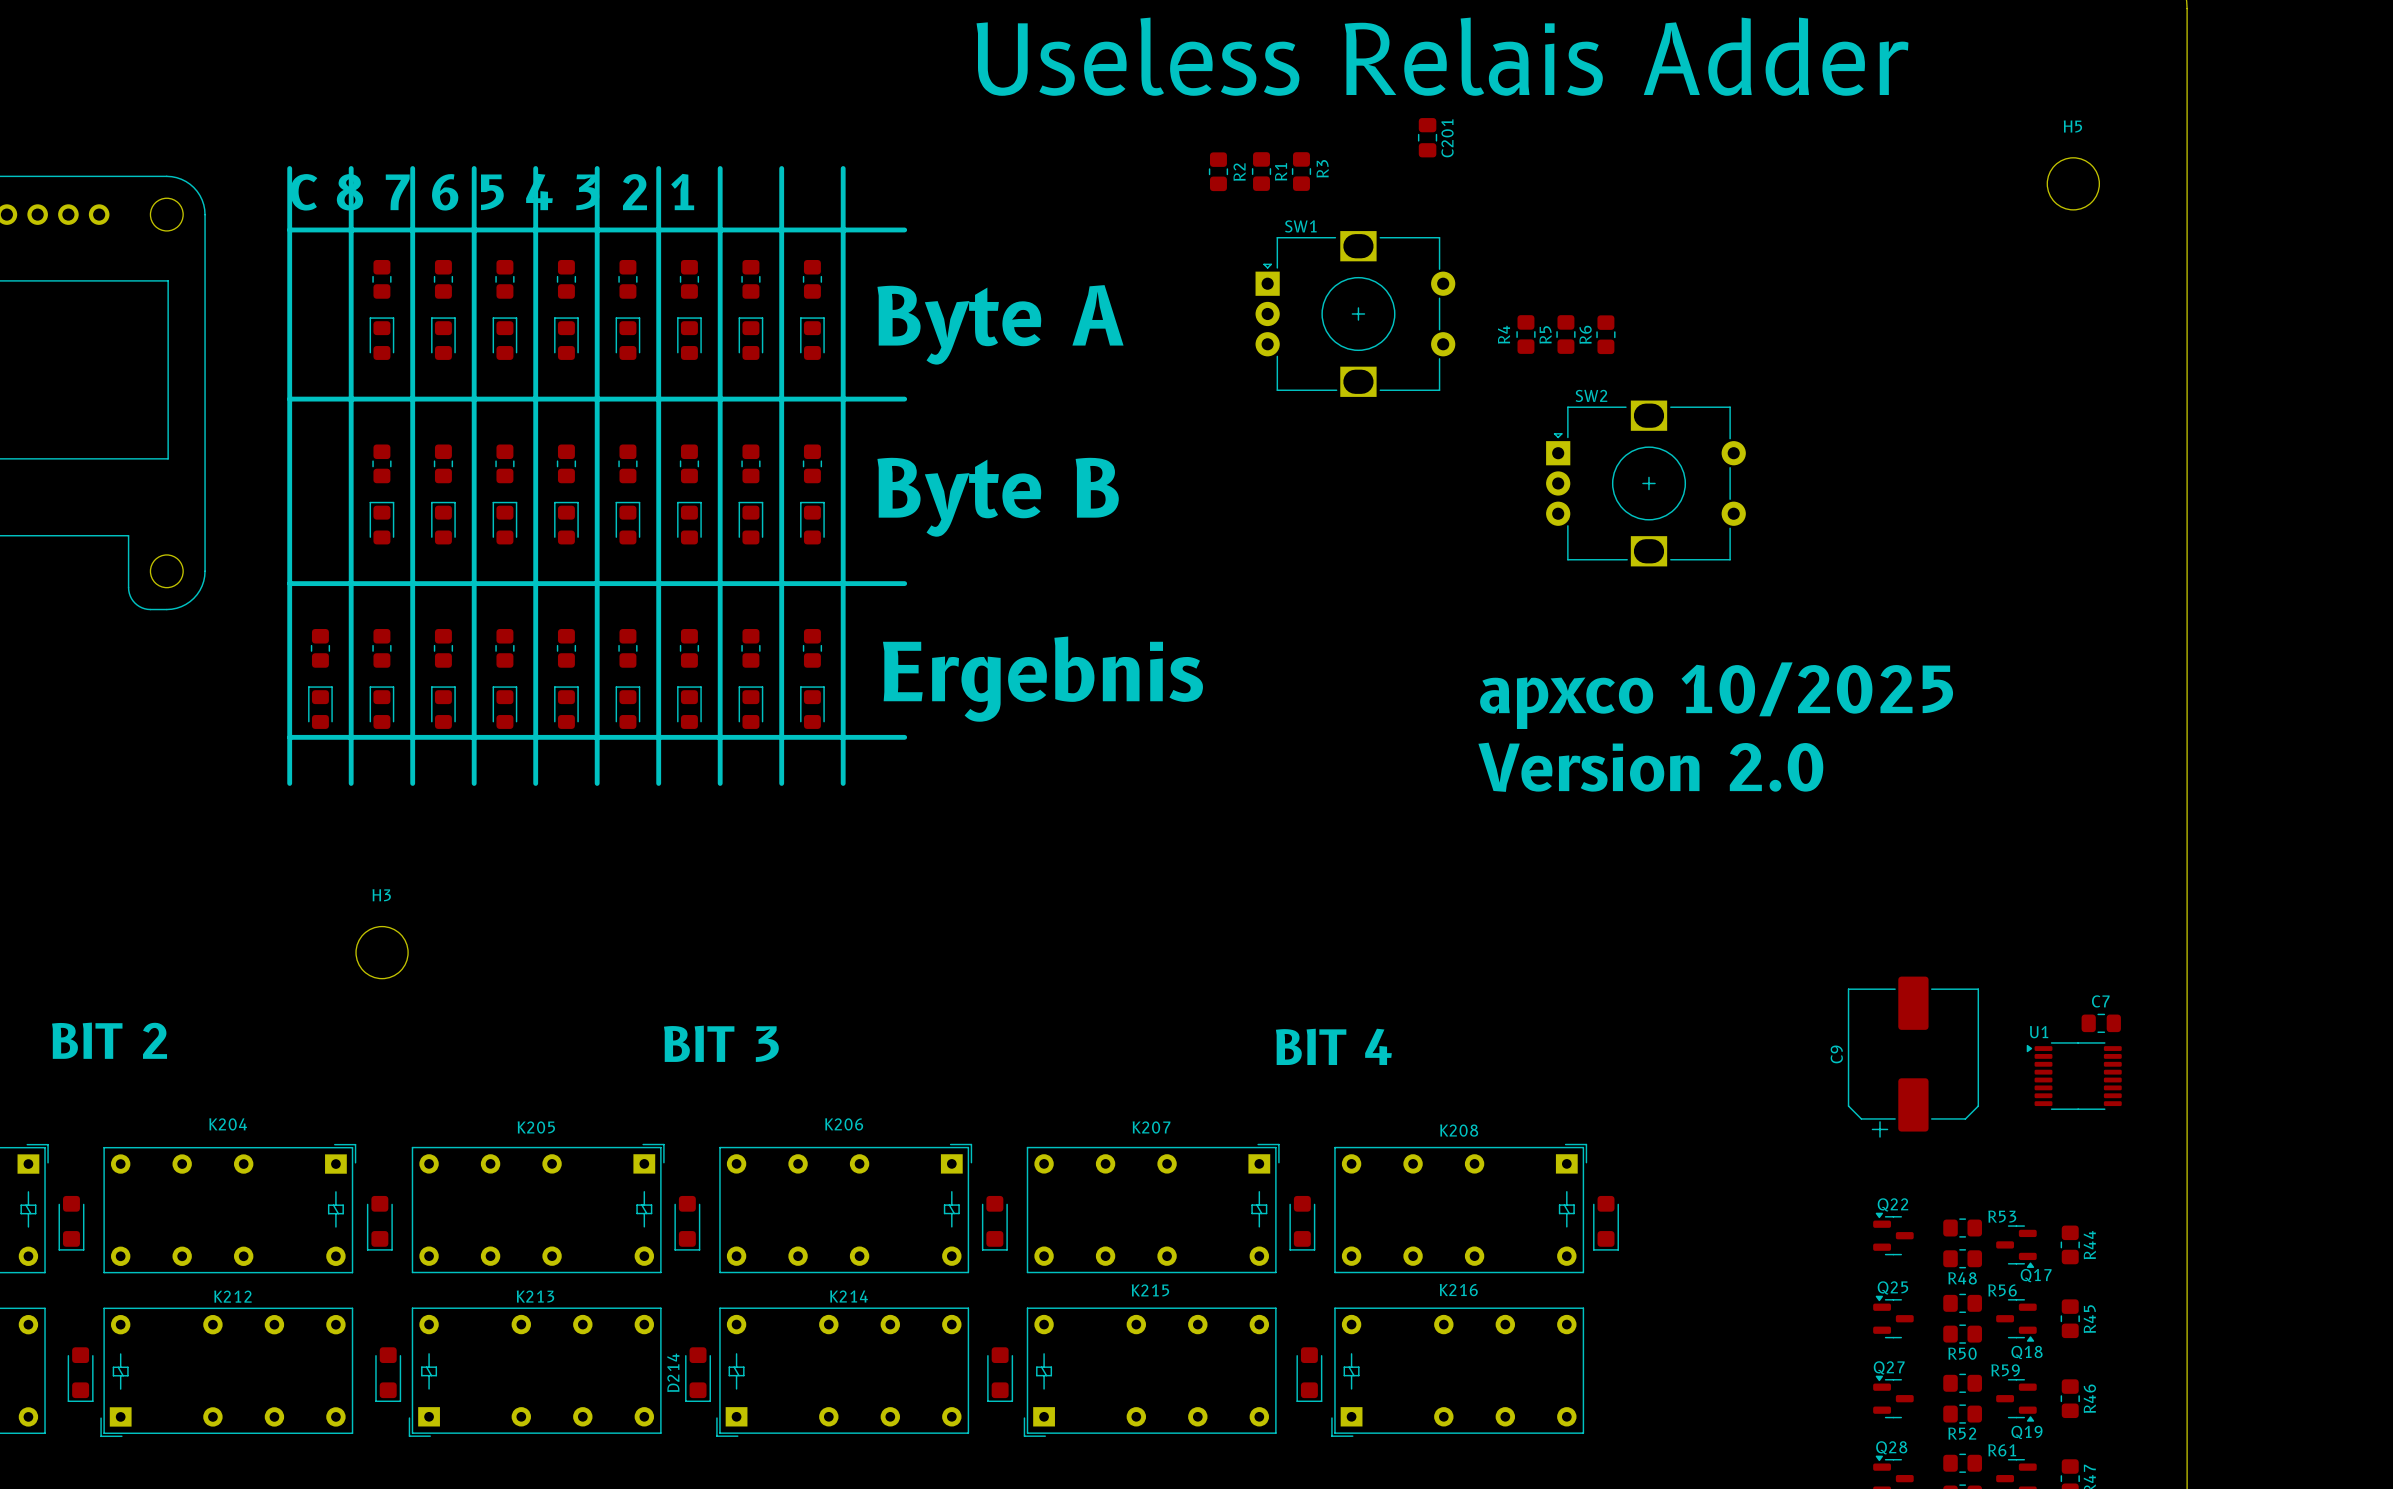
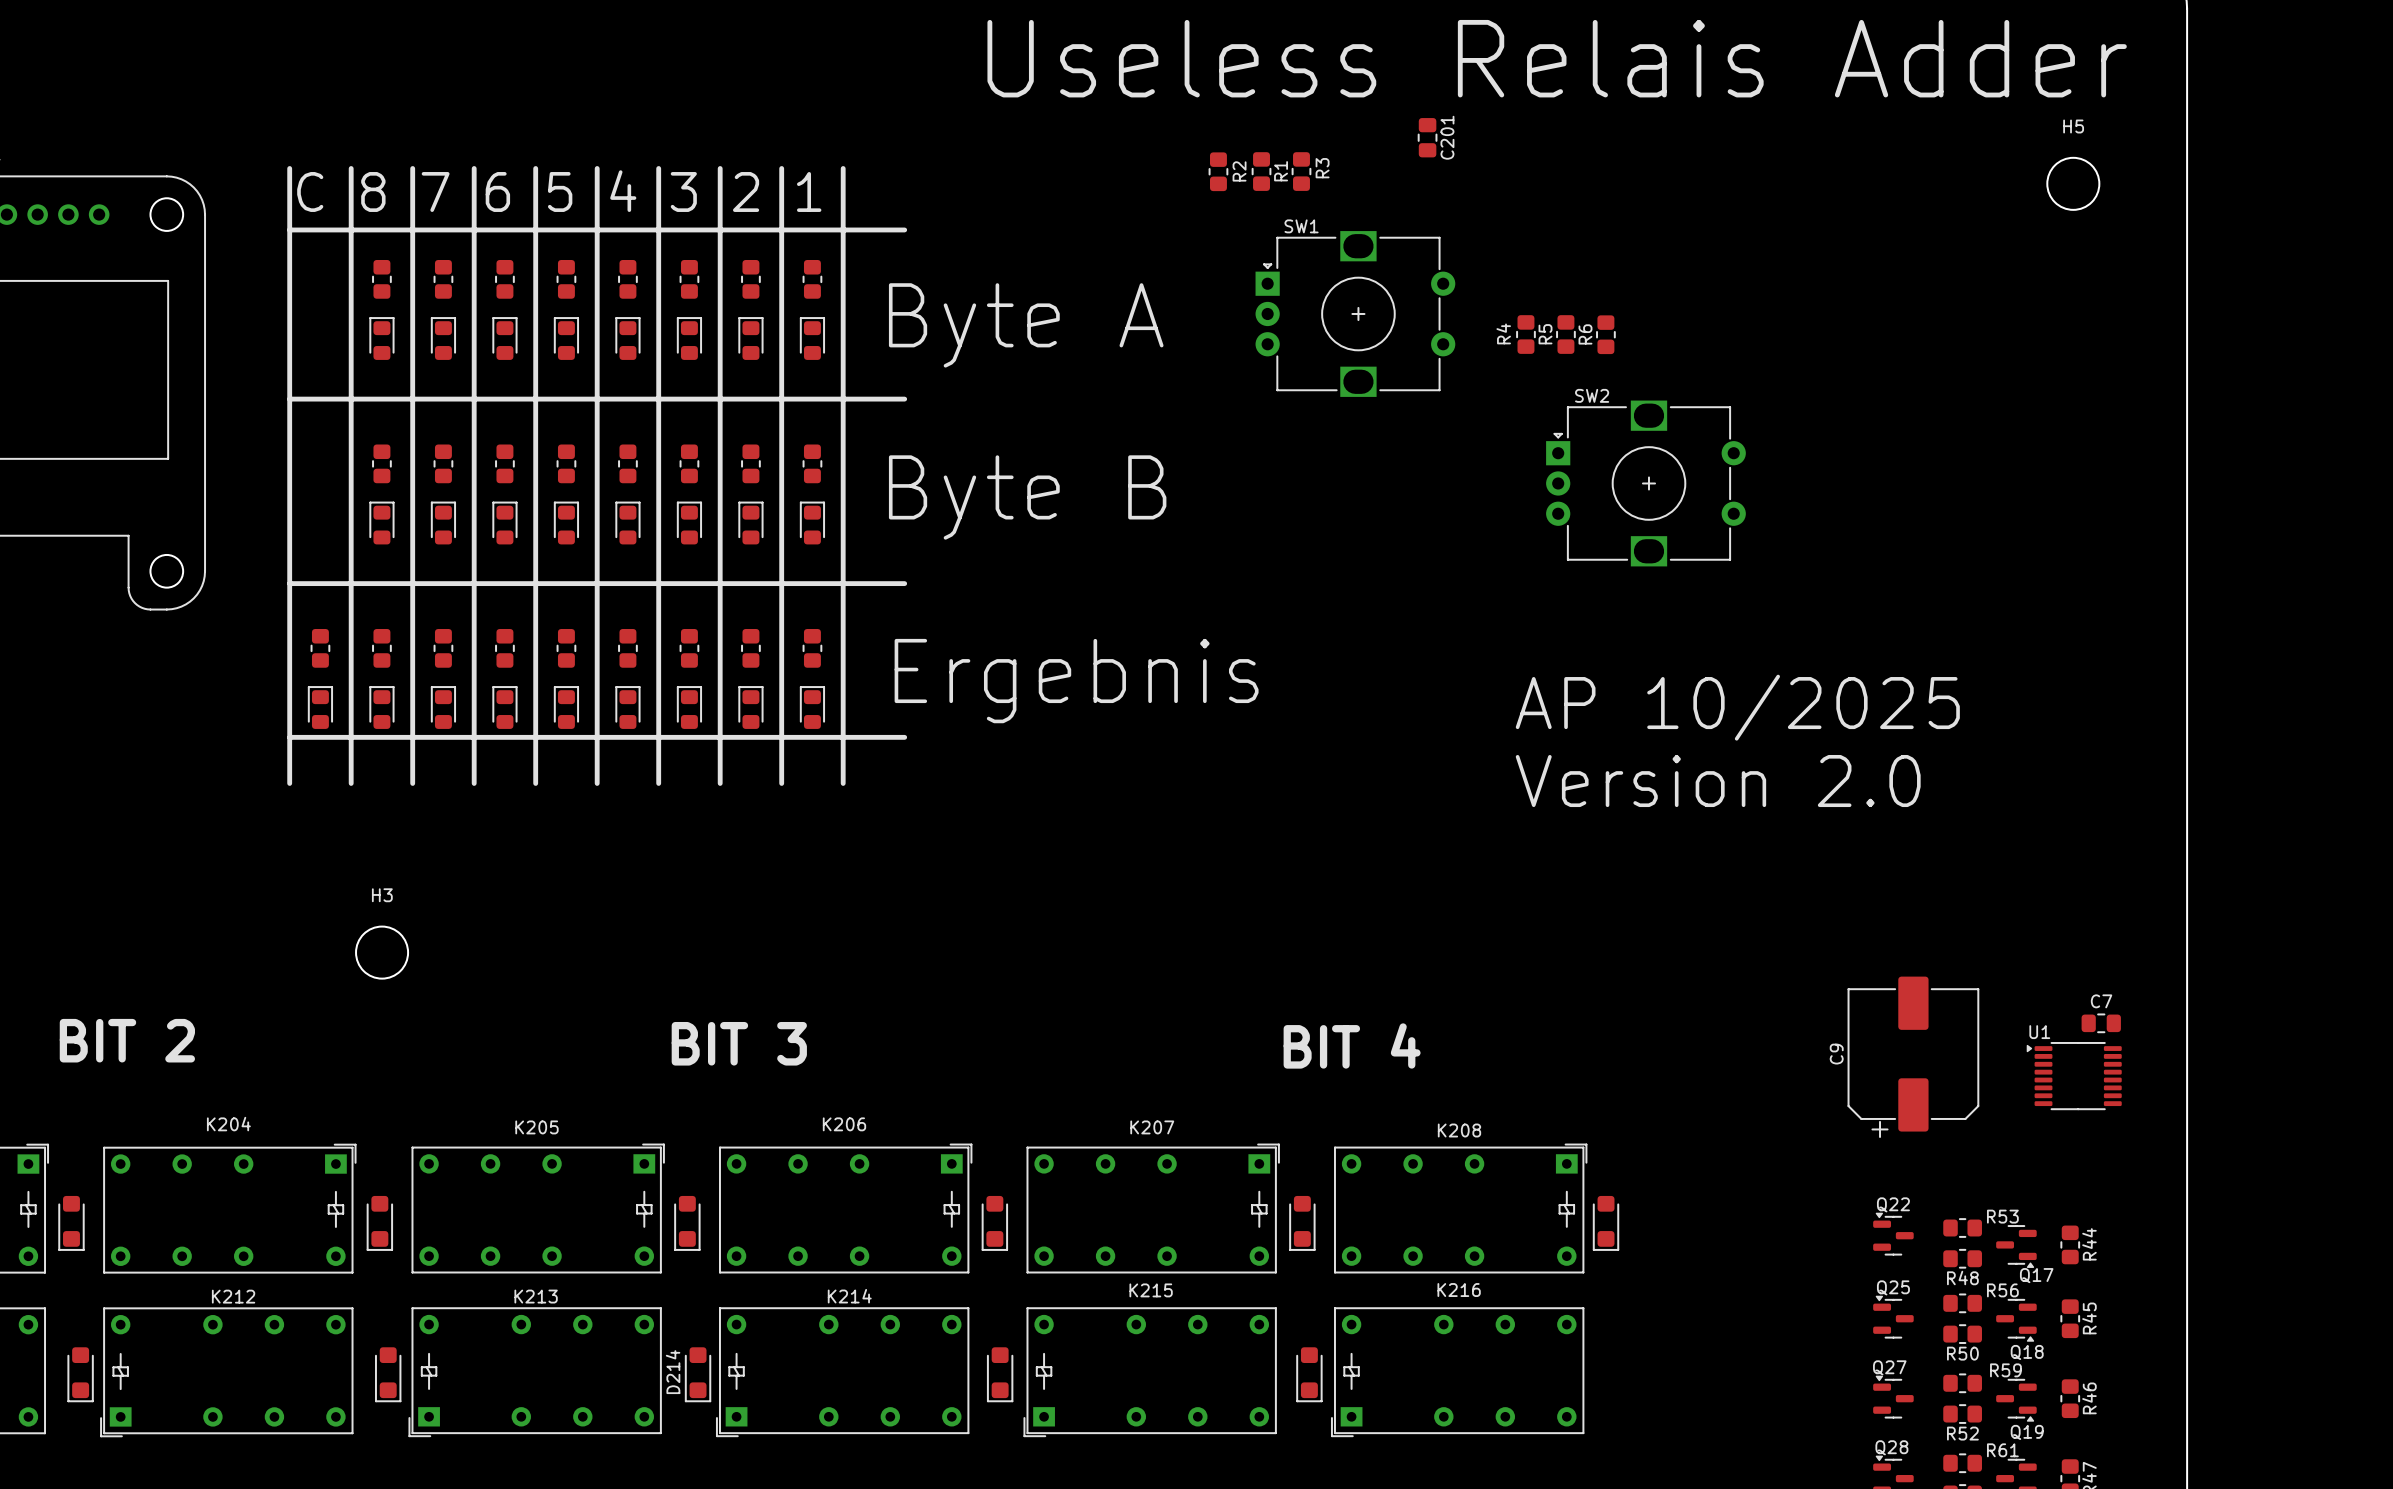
text: apxco 10/2025 (1716, 695) -> AP 10/2025 (1737, 707)
text position: Version 2.0 (1650, 767) -> Version 2.0 (1718, 781)

